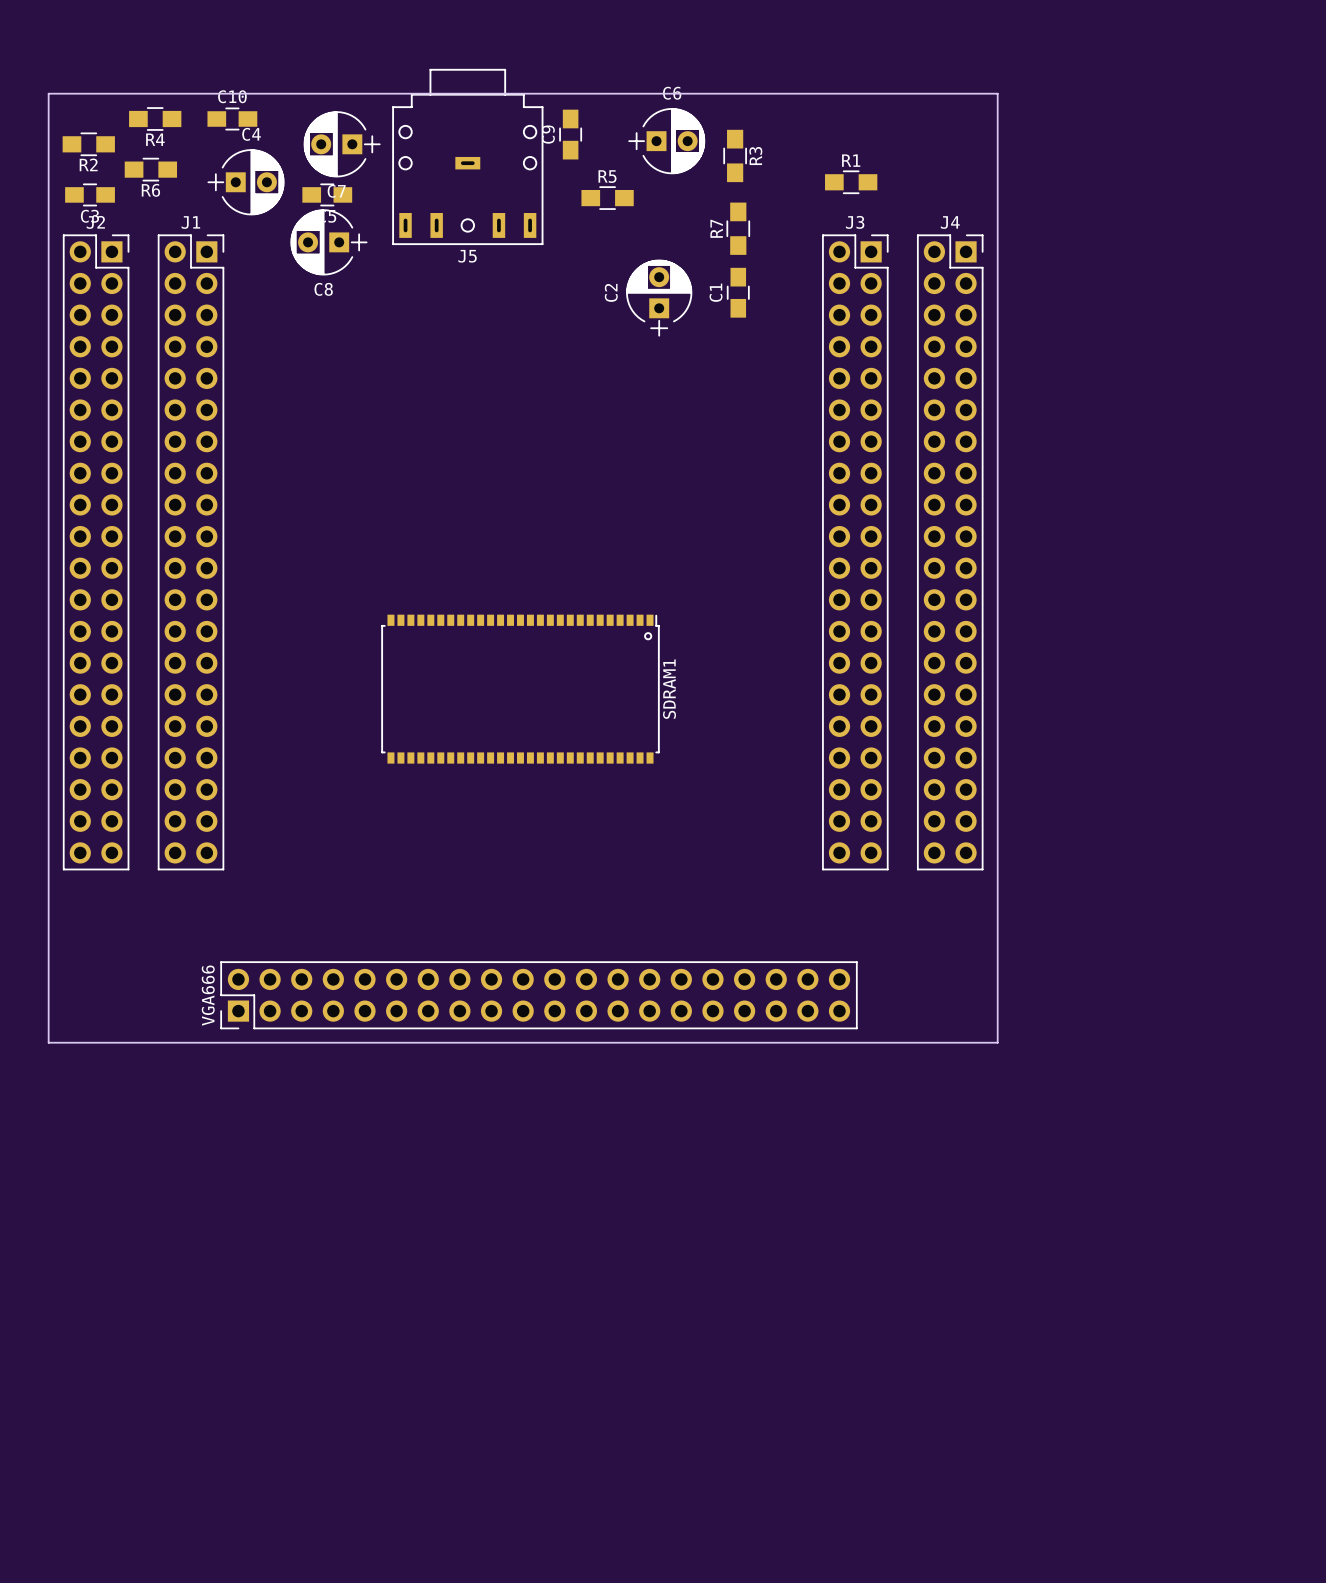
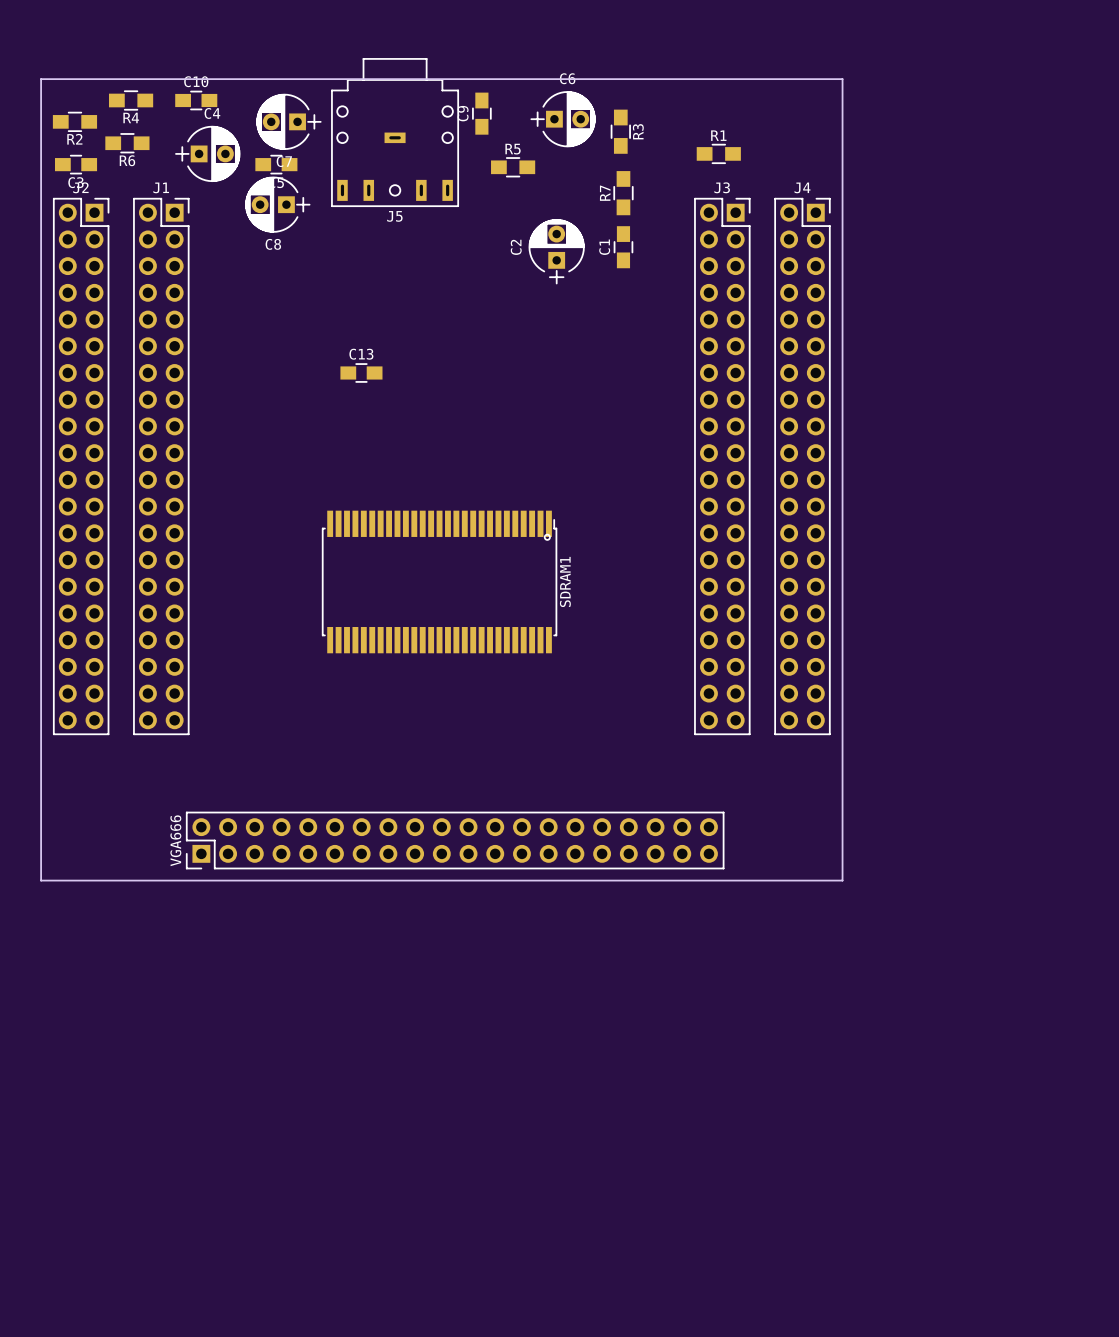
C13: none -> (361, 372)
SDRAM1 footprint: [381, 614, 660, 764] -> [321, 510, 558, 654]

